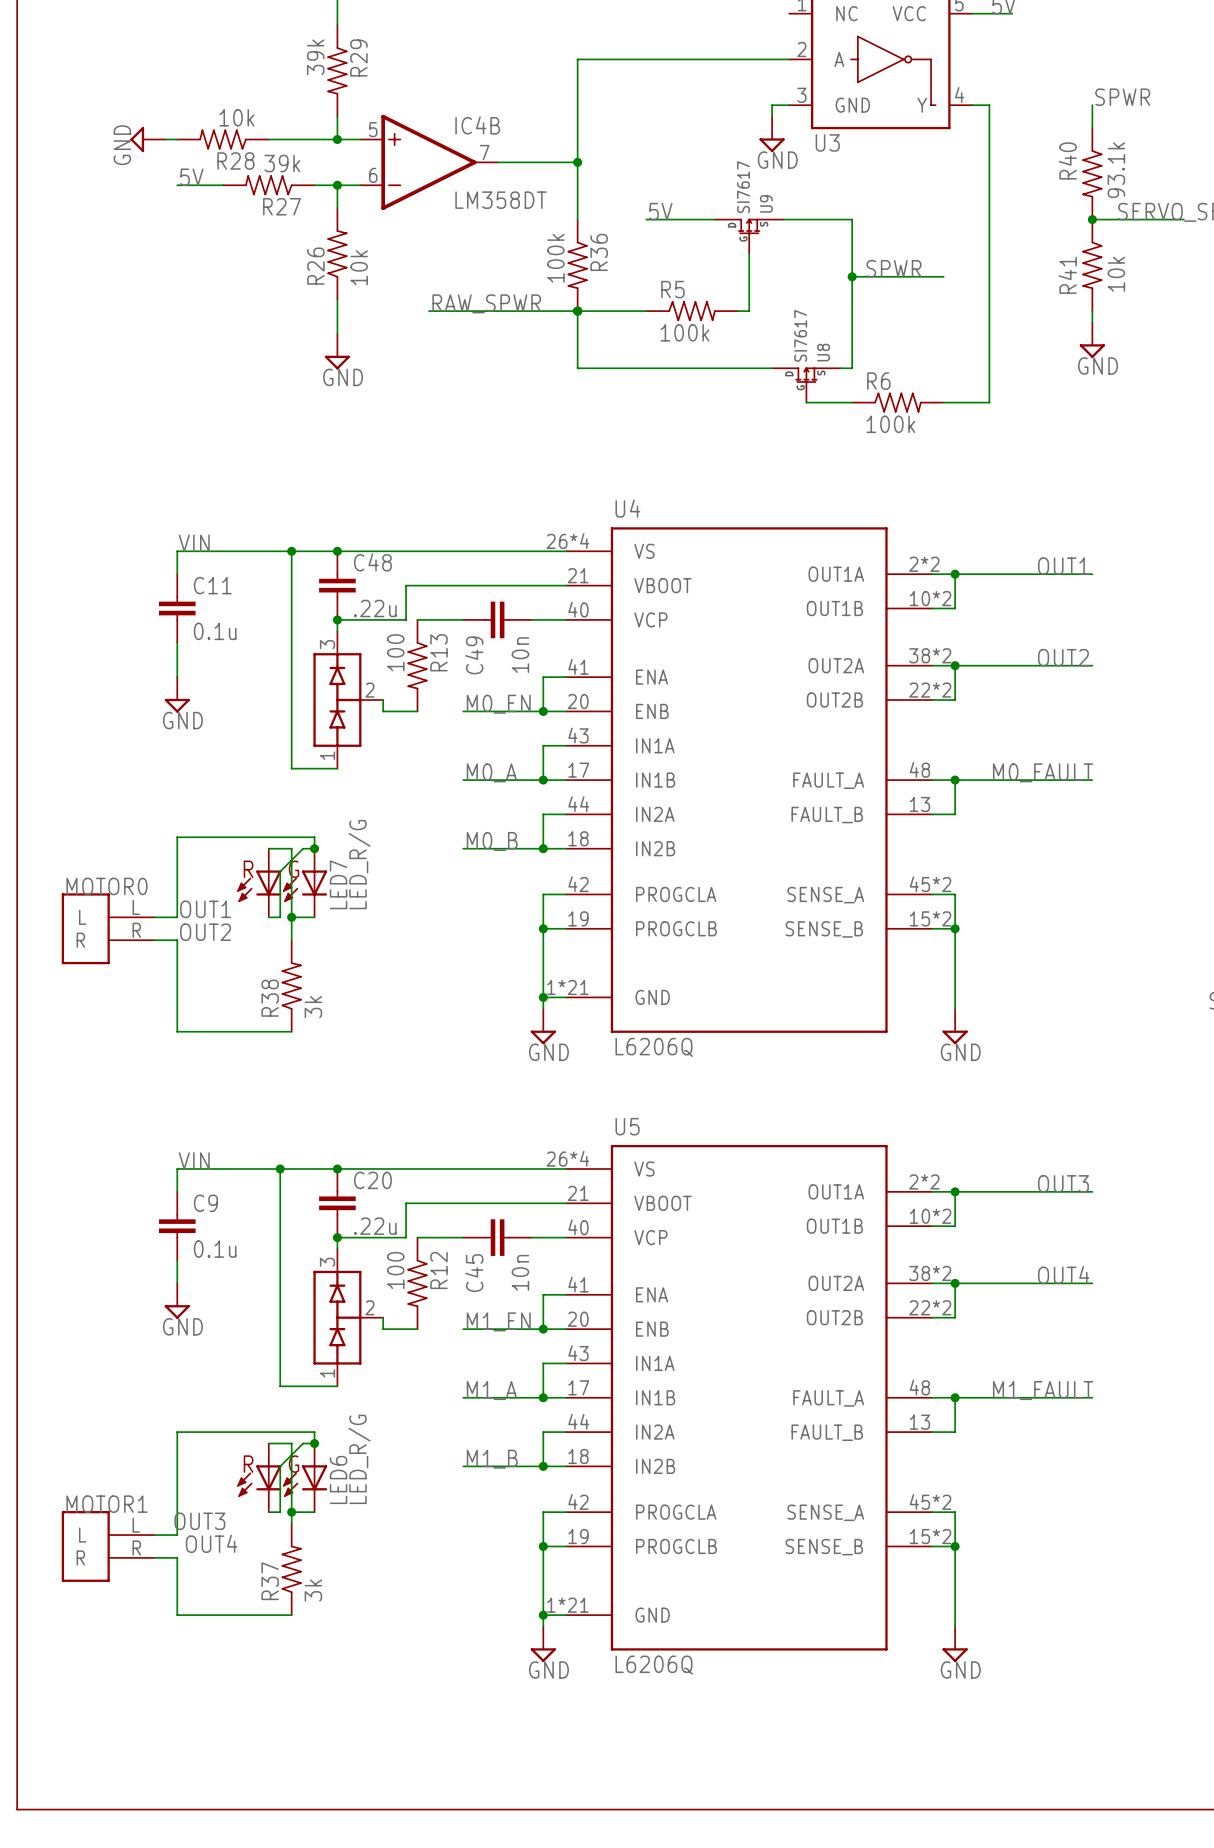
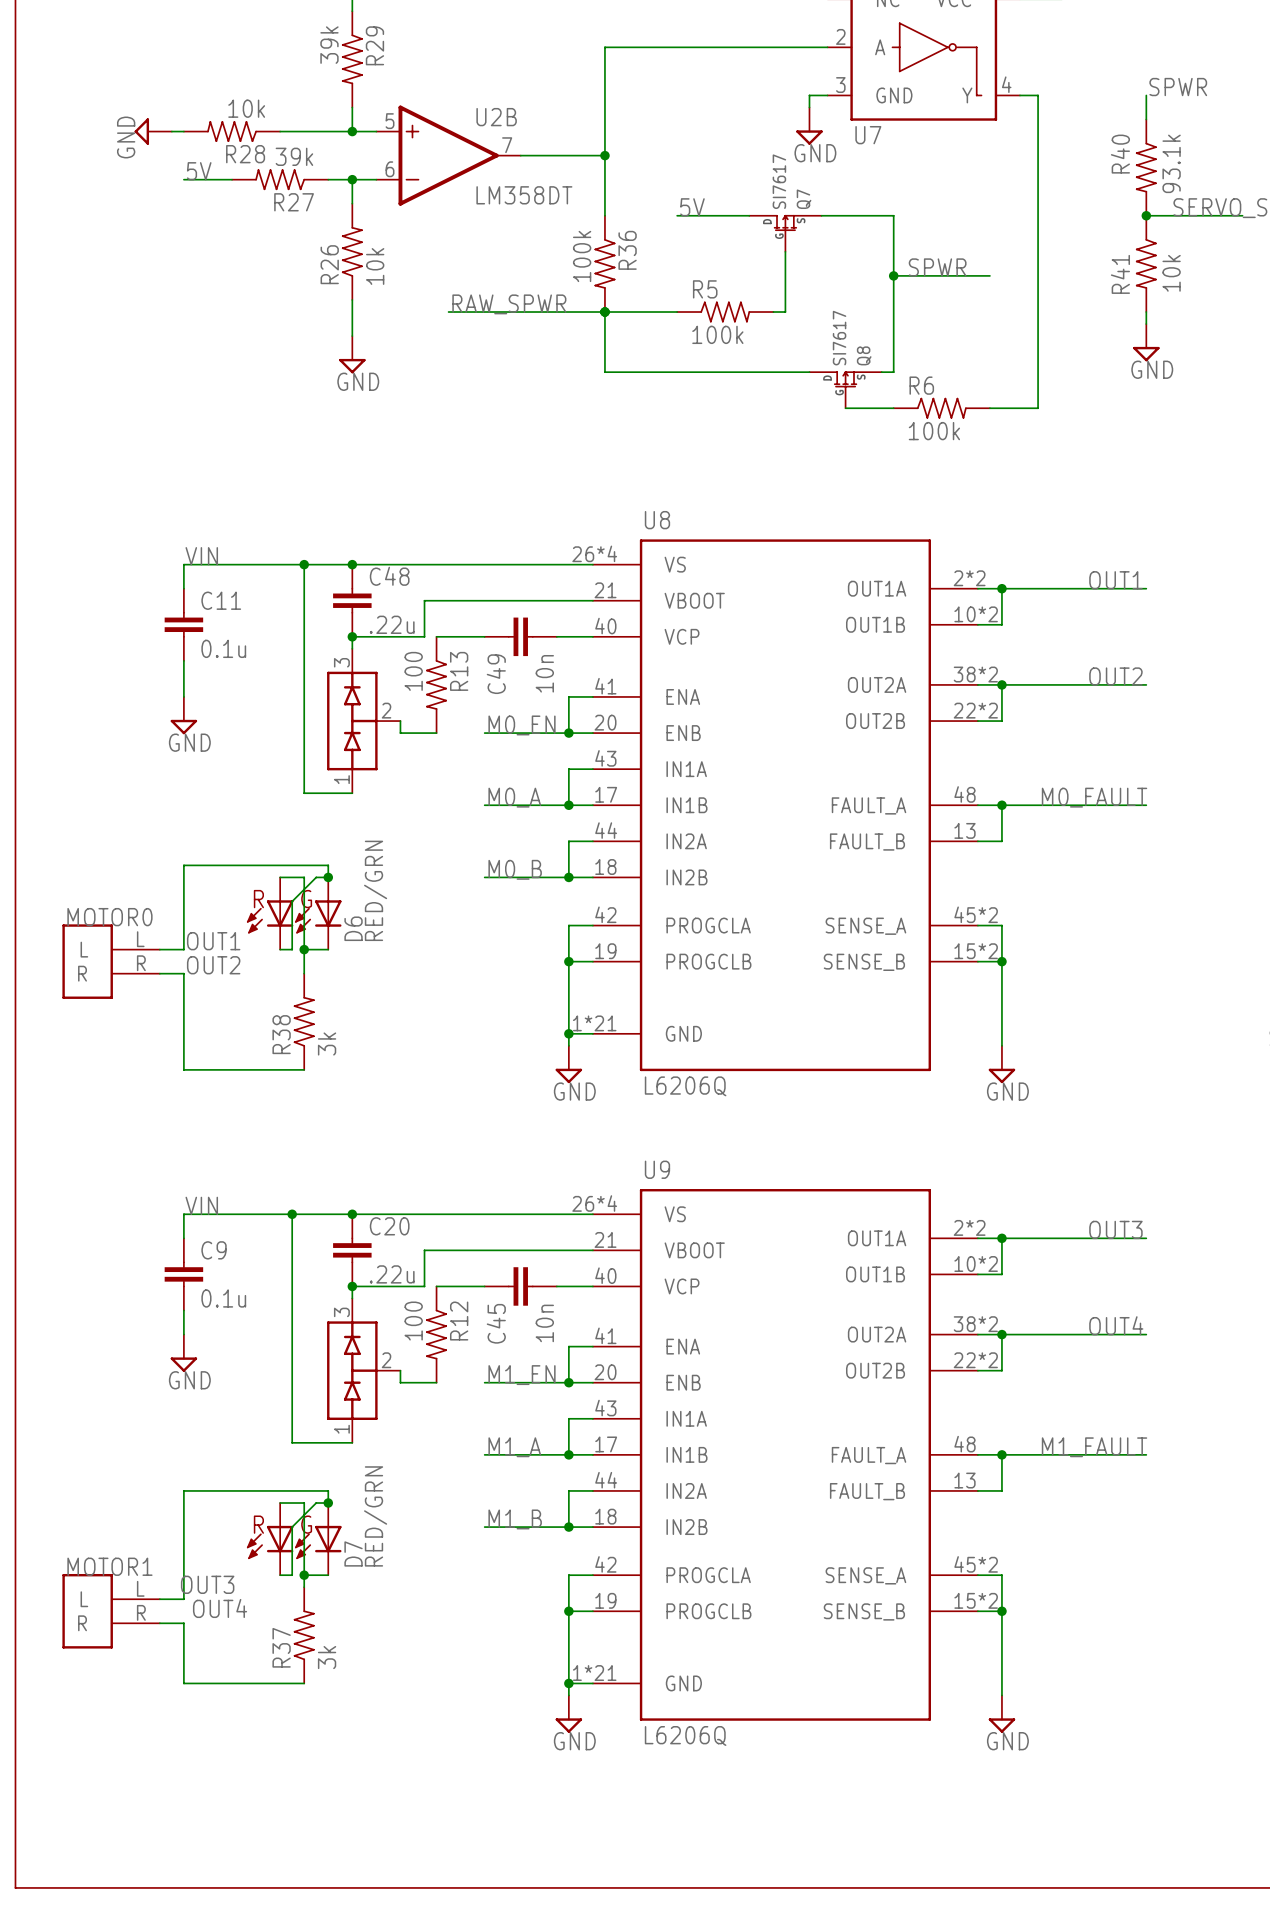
IC4B name: IC4B (477, 125) -> U2B (496, 117)
U3 name: U3 (827, 142) -> U7 (868, 135)
U9 name: U9 (766, 203) -> Q7 (804, 199)
U8 name: U8 (823, 352) -> Q8 (864, 355)
U4 name: U4 (627, 508) -> U8 (657, 520)
LED7 value: LED_R/G (359, 864) -> RED/GRN (375, 890)
LED7 name: LED7 (338, 884) -> D6 (353, 928)
U5 name: U5 (627, 1126) -> U9 (657, 1169)
LED6 value: LED_R/G (359, 1459) -> RED/GRN (375, 1516)
LED6 name: LED6 (338, 1479) -> D7 (353, 1553)

